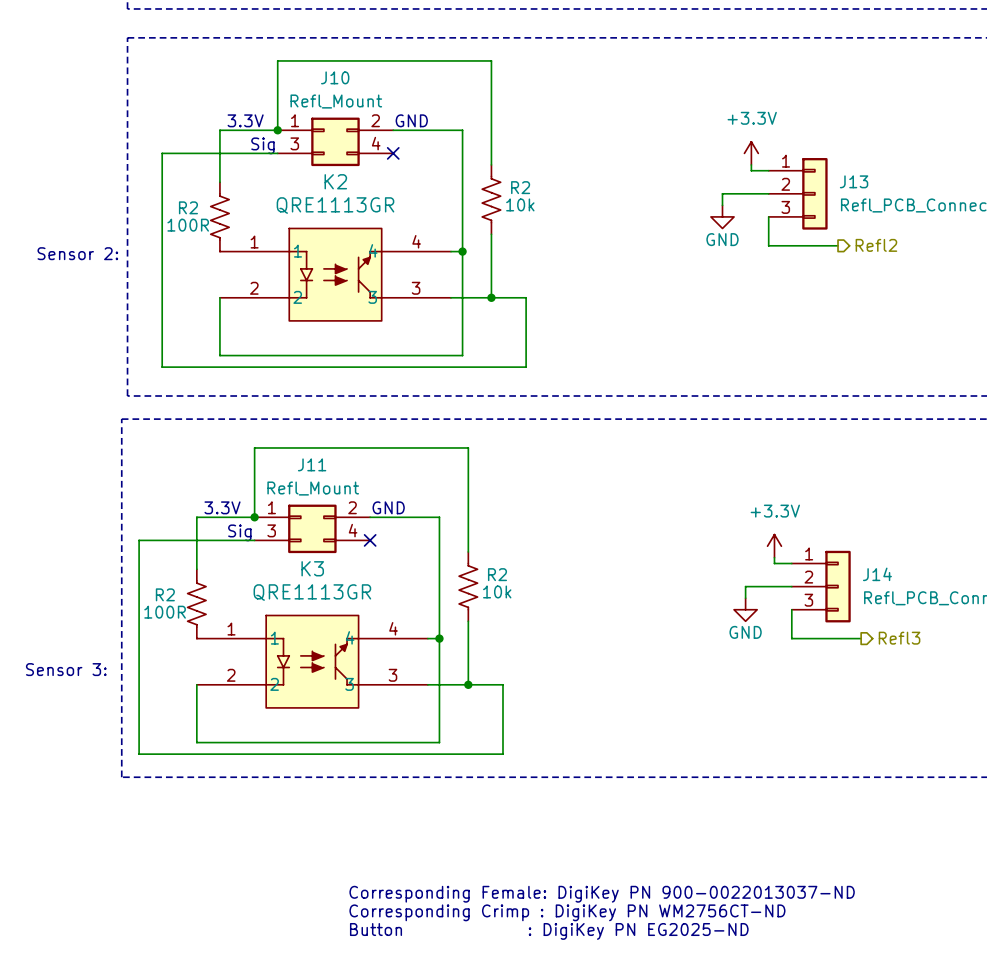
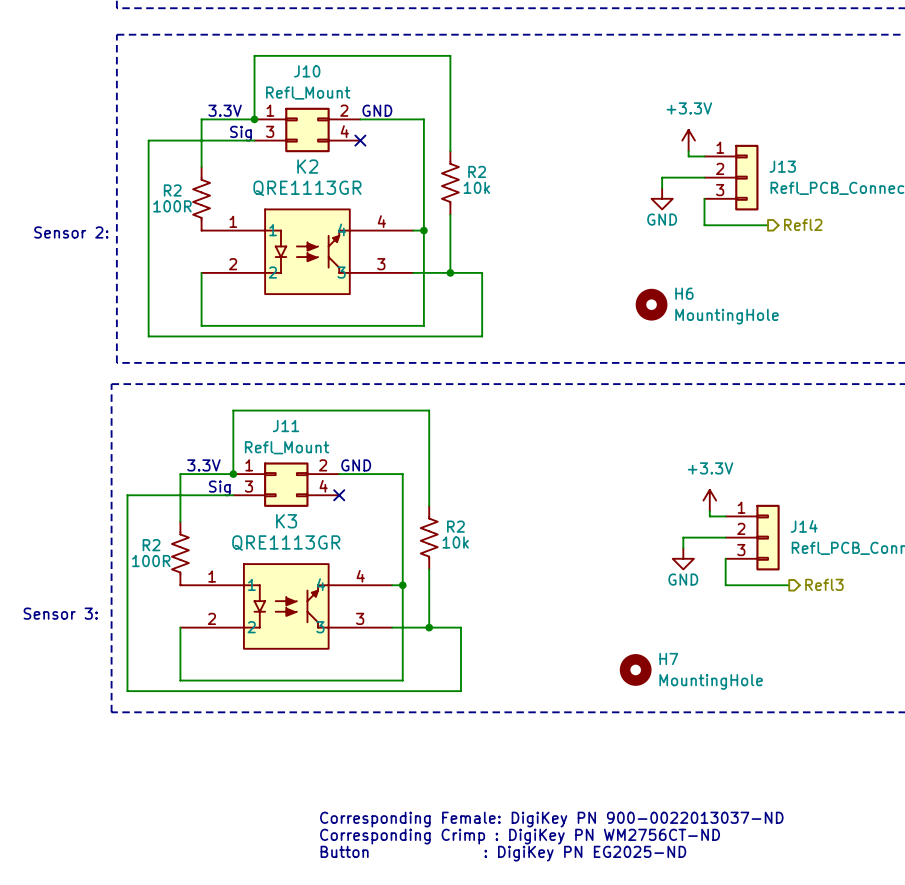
H6: none -> MountingHole (651, 304)
H7: none -> MountingHole (635, 669)

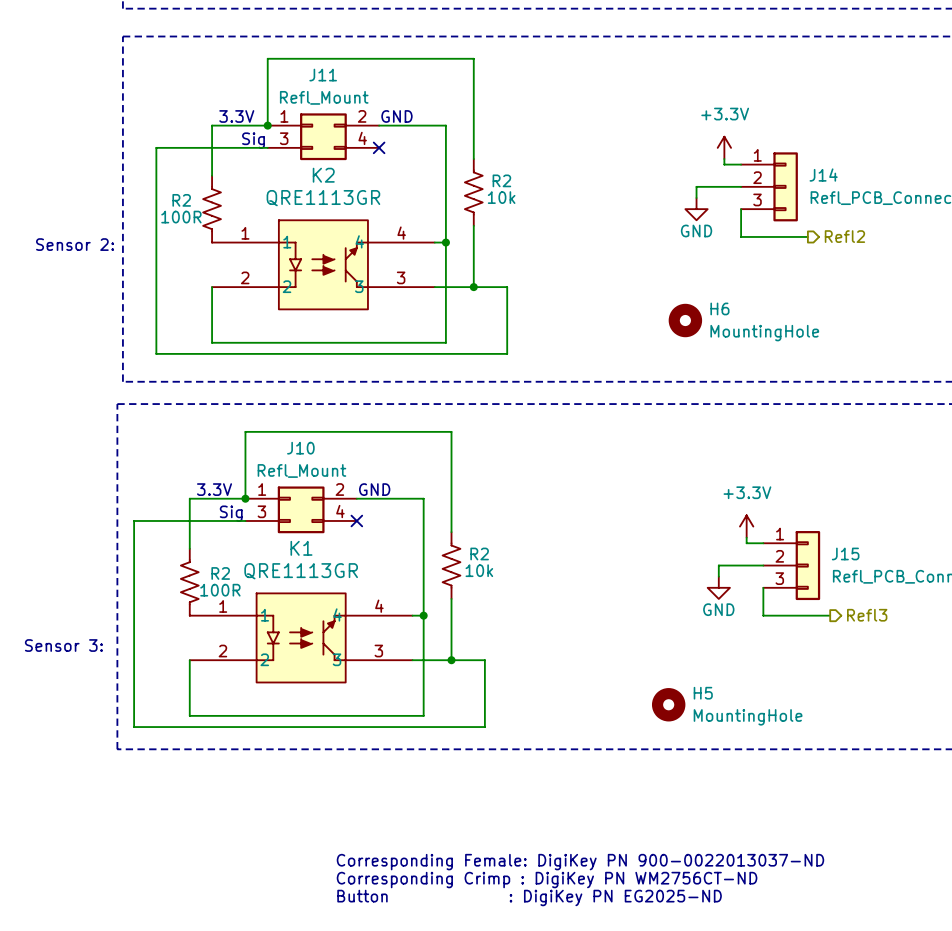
J10 name: J10 (307, 71) -> J11 (323, 75)
J13 name: J13 (782, 166) -> J14 (823, 175)
J11 name: J11 (286, 426) -> J10 (300, 448)
K3 name: K3 (286, 521) -> K1 (301, 548)
J14 name: J14 (804, 526) -> J15 (845, 553)
R2 flip: as is (180, 553) -> left-right (189, 582)
H7 name: H7 (668, 658) -> H5 (703, 693)

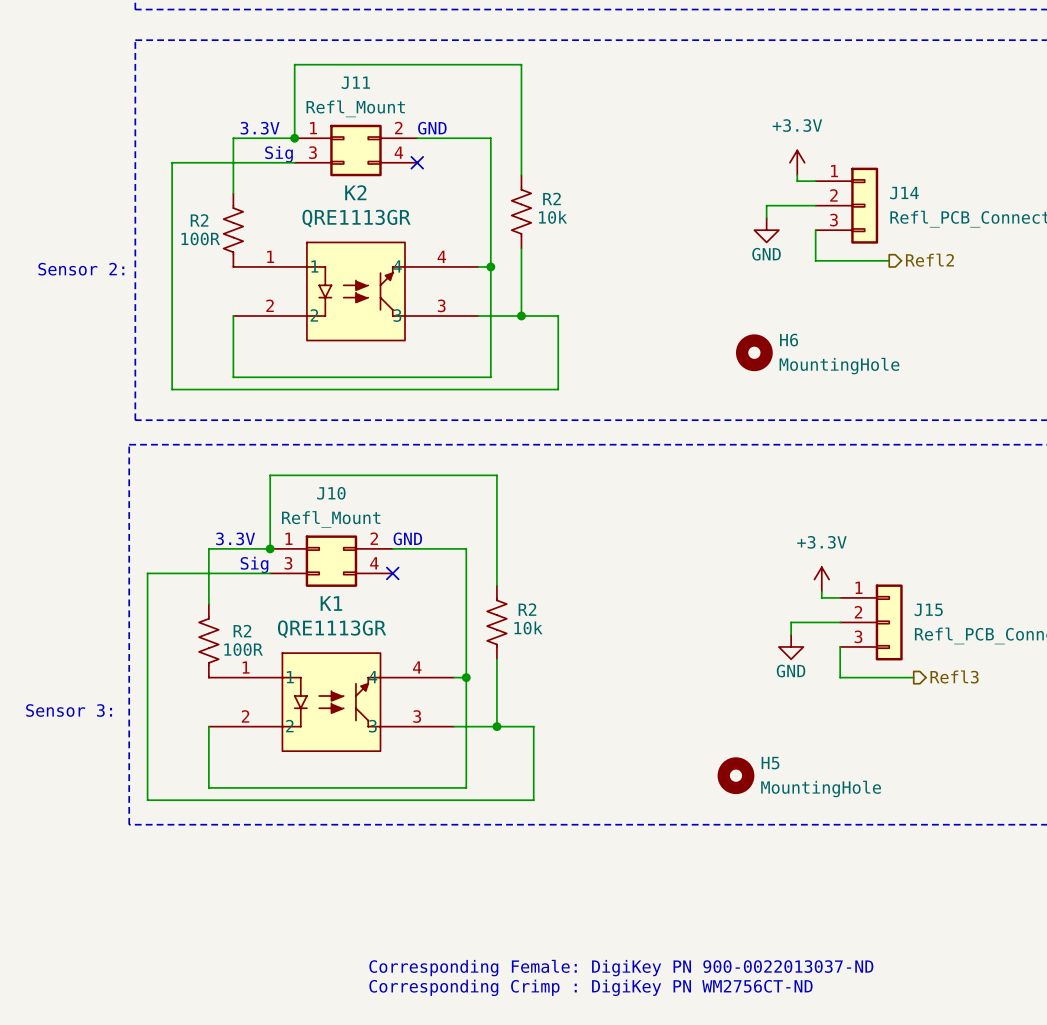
text: Corresponding Female: DigiKey PN 900-0022013037-ND (580, 862) -> none
text: Corresponding Crimp : DigiKey PN WM2756CT-ND (547, 880) -> Corresponding Female: DigiKey PN 900-0022013037-ND (621, 968)
text: Button : DigiKey PN EG2025-ND (529, 897) -> Corresponding Crimp : DigiKey PN WM2756CT-ND (590, 987)

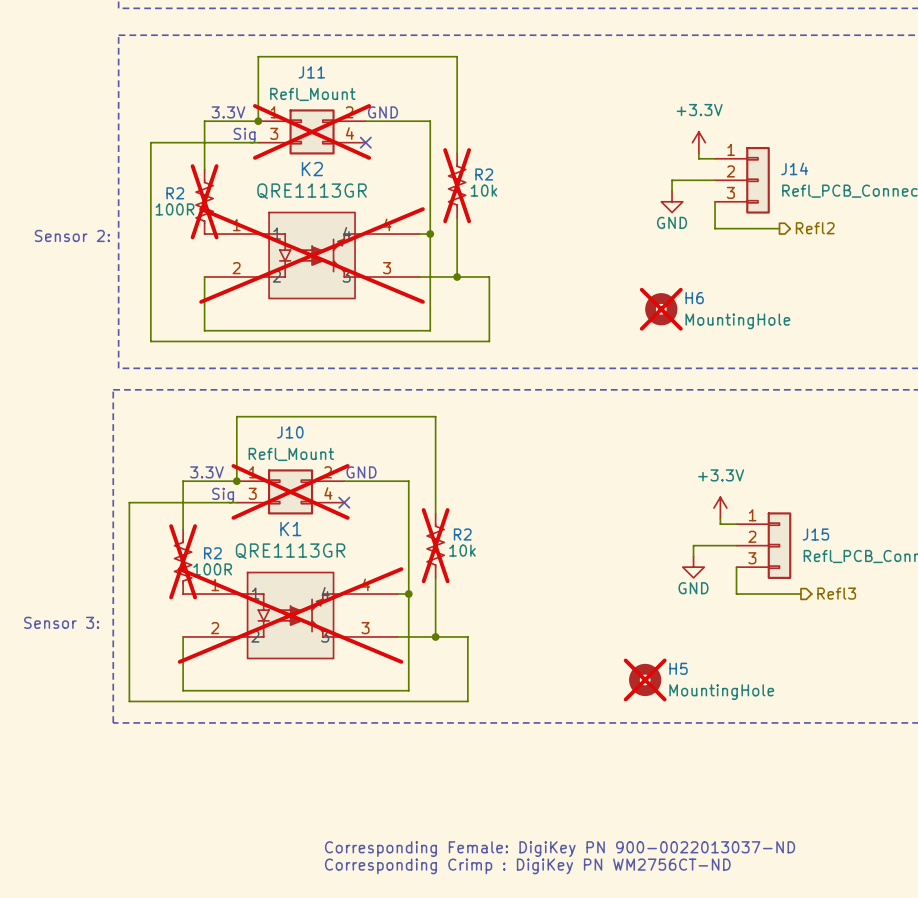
J11 do-not-place cross: none -> (312, 131)
R2 do-not-place cross: none -> (457, 185)
R2 do-not-place cross: none -> (204, 201)
K2 do-not-place cross: none -> (312, 255)
H6 do-not-place cross: none -> (661, 309)
J10 do-not-place cross: none -> (290, 491)
R2 do-not-place cross: none -> (435, 545)
R2 do-not-place cross: none -> (183, 561)
K1 do-not-place cross: none -> (290, 615)
H5 do-not-place cross: none -> (645, 679)

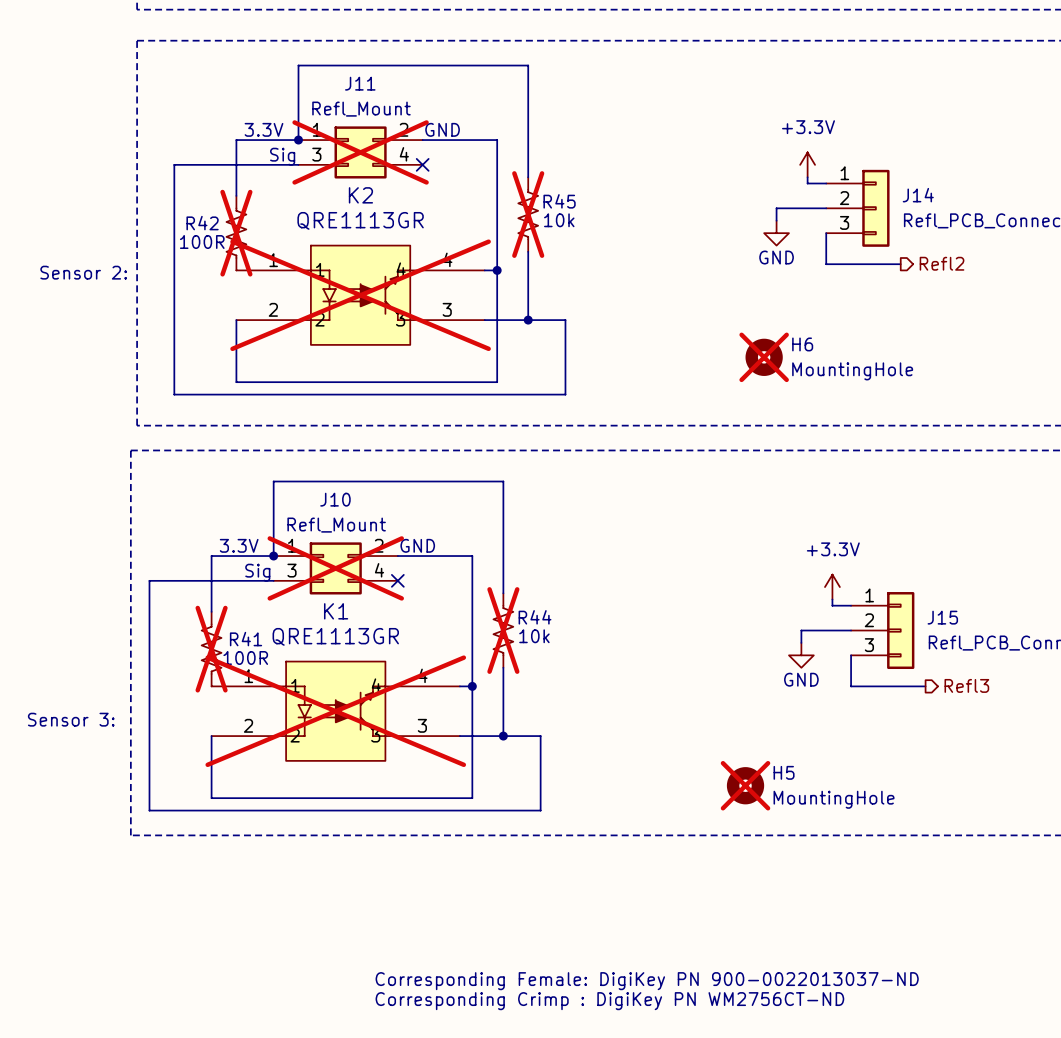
R2 name: R2 (484, 174) -> R45 (559, 201)
R2 name: R2 (175, 193) -> R42 (202, 223)
R2 name: R2 (462, 534) -> R44 (535, 617)
R2 name: R2 (212, 553) -> R41 (246, 639)

